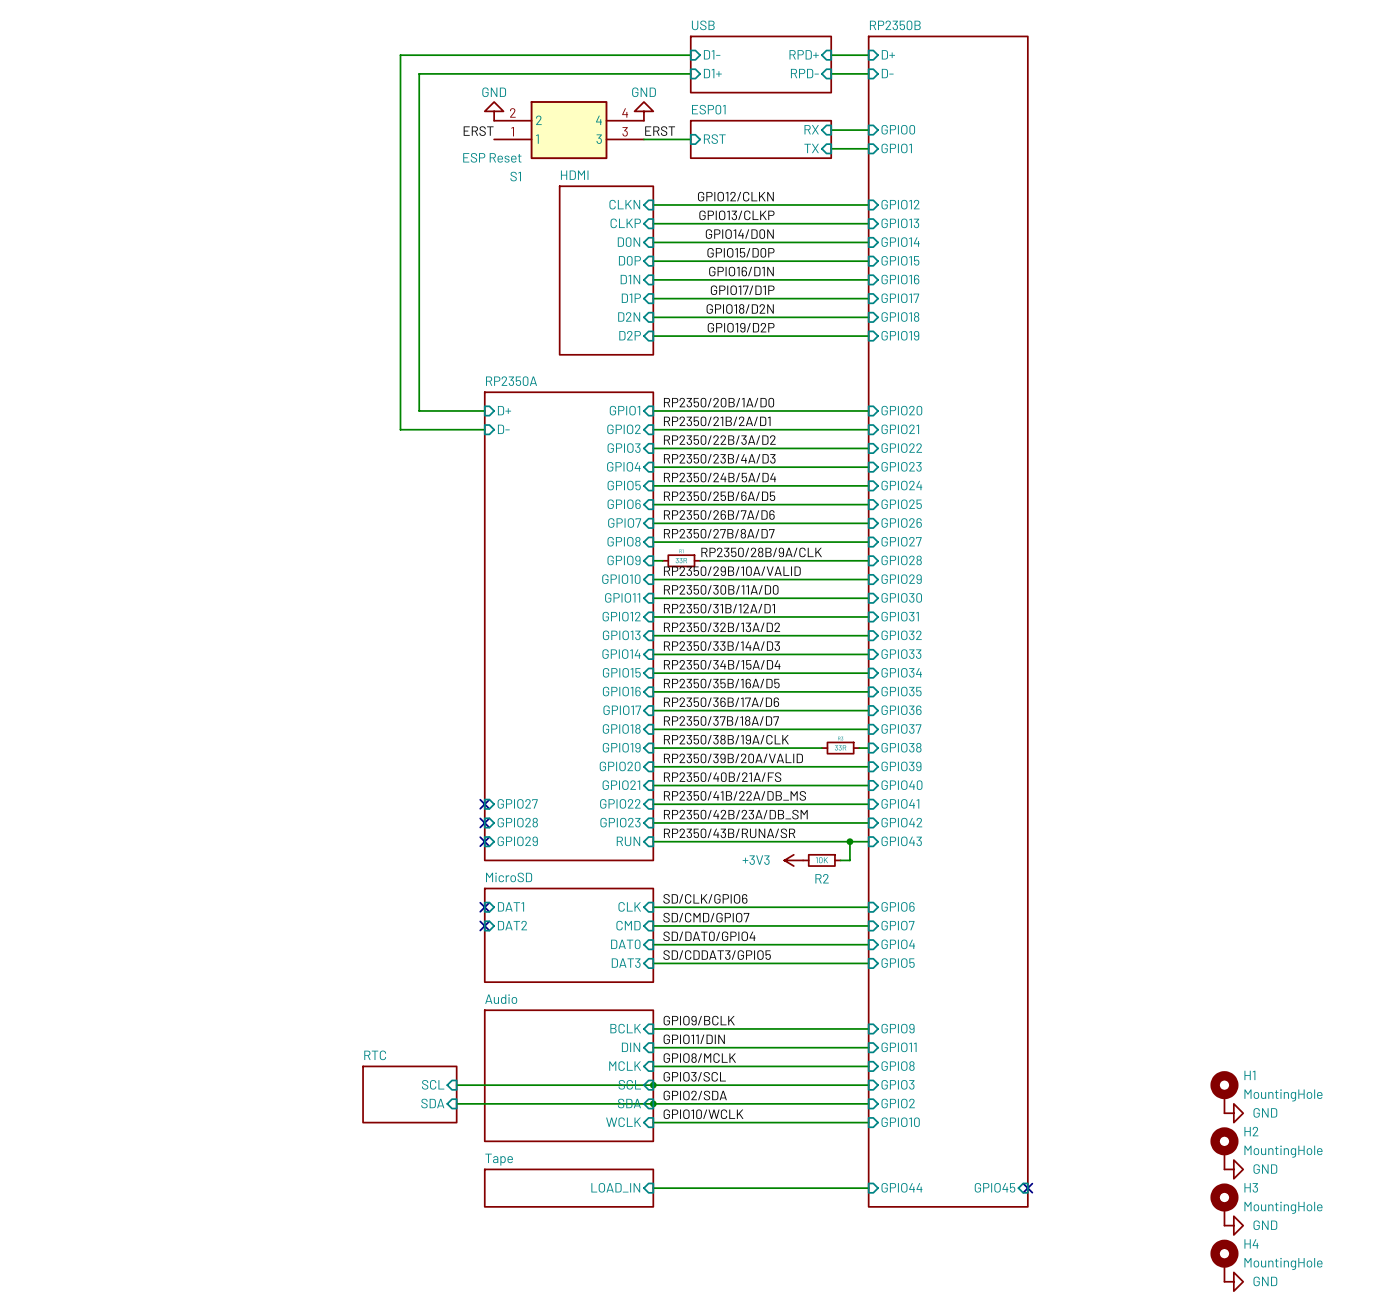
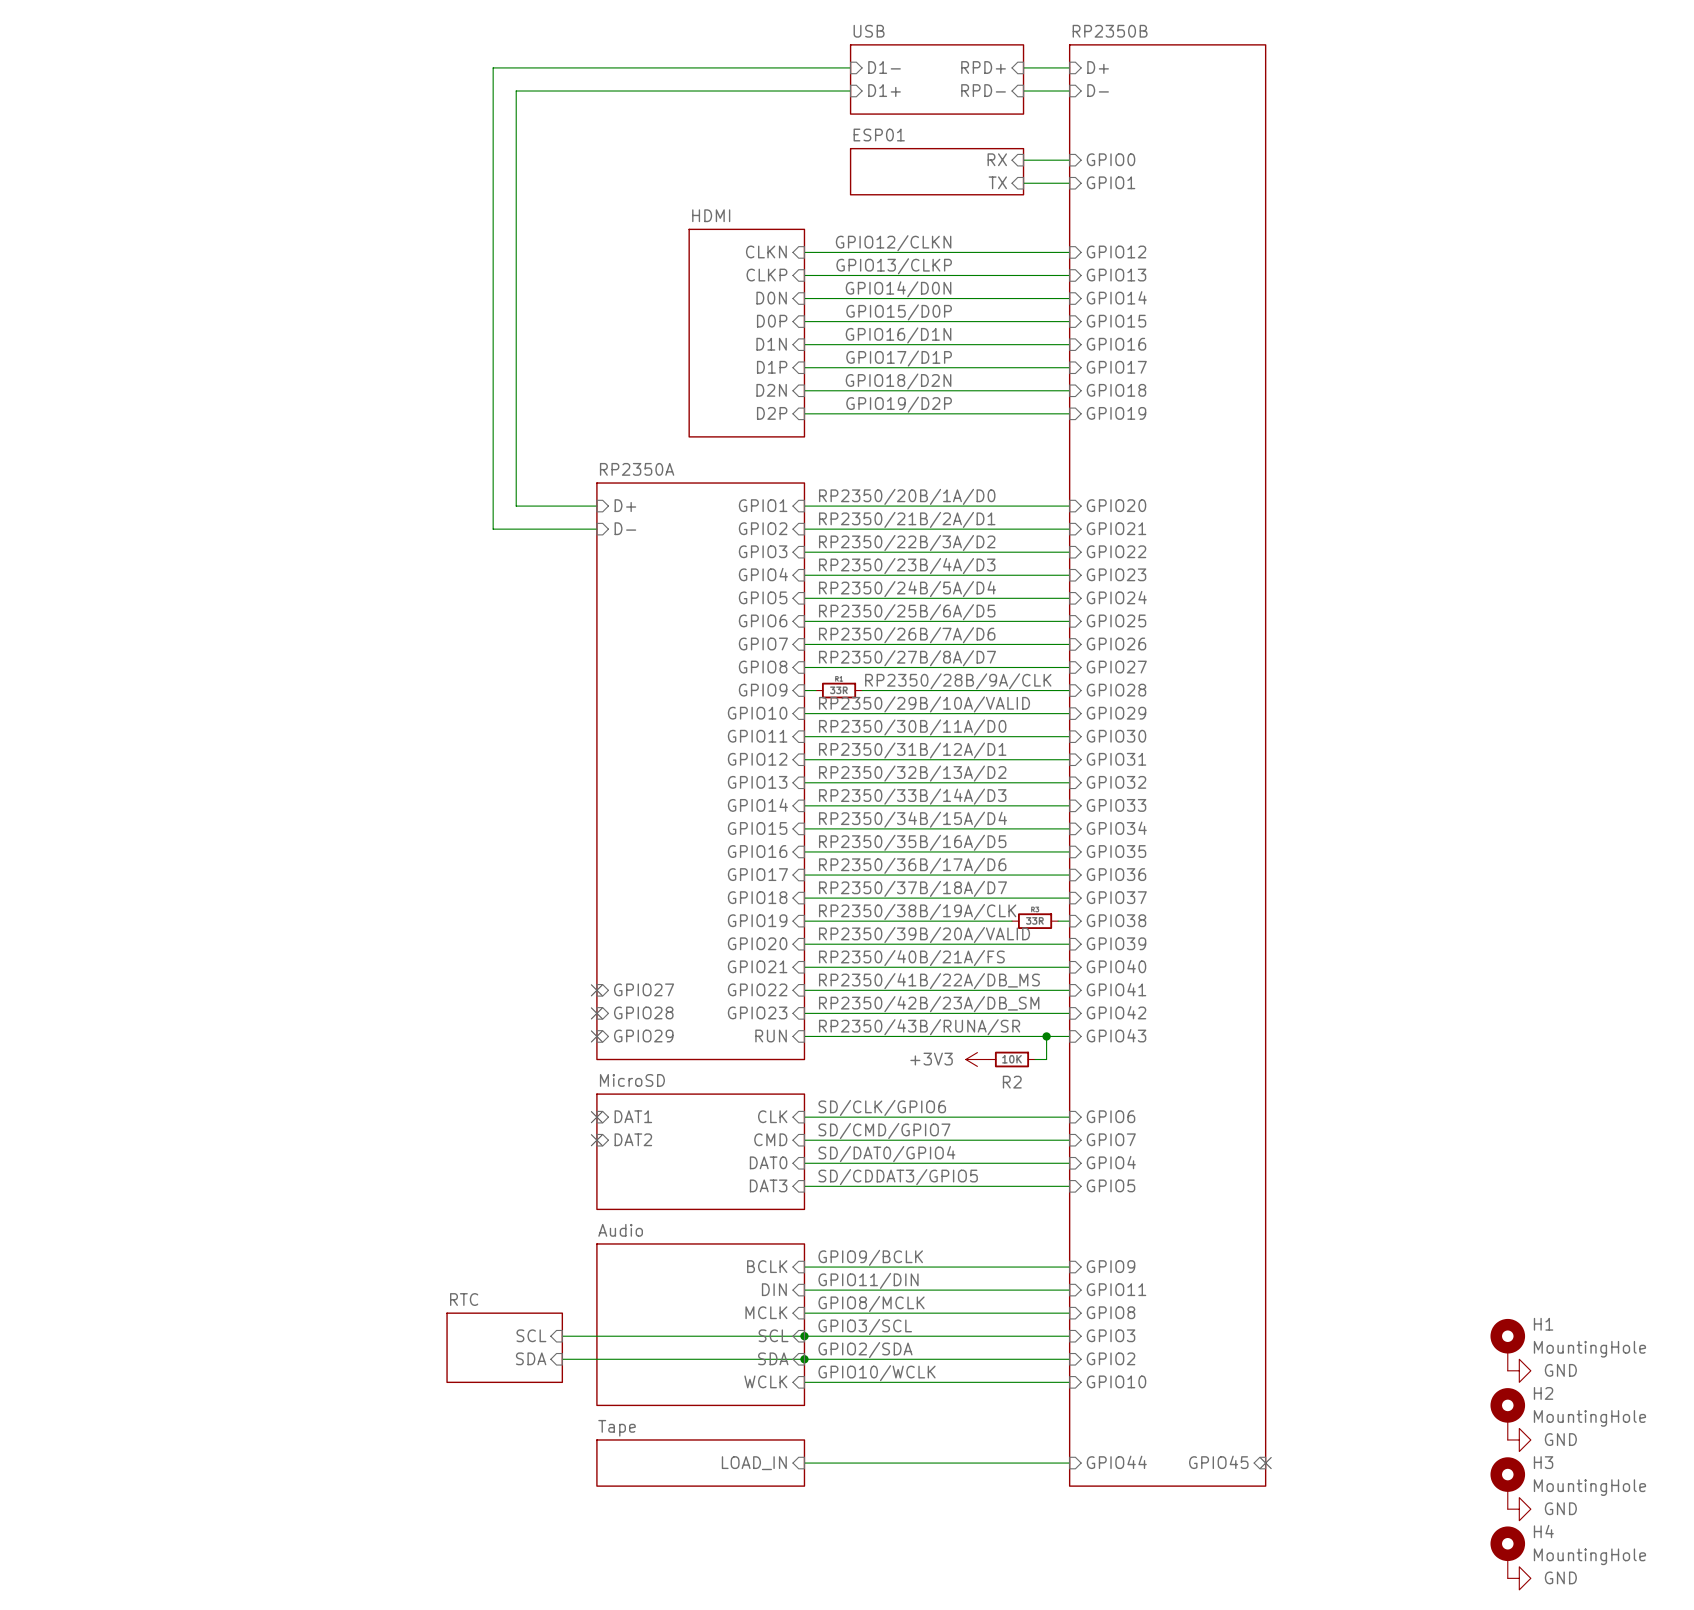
power symbol: GND (494, 111) -> none
power symbol: GND (643, 111) -> none
S1: ESP Reset (569, 130) -> none
label: ERST (478, 131) -> none
label: ERST (660, 131) -> none
wire: (643, 139) (690, 139) -> none
sheet pin: RST (714, 139) -> none

